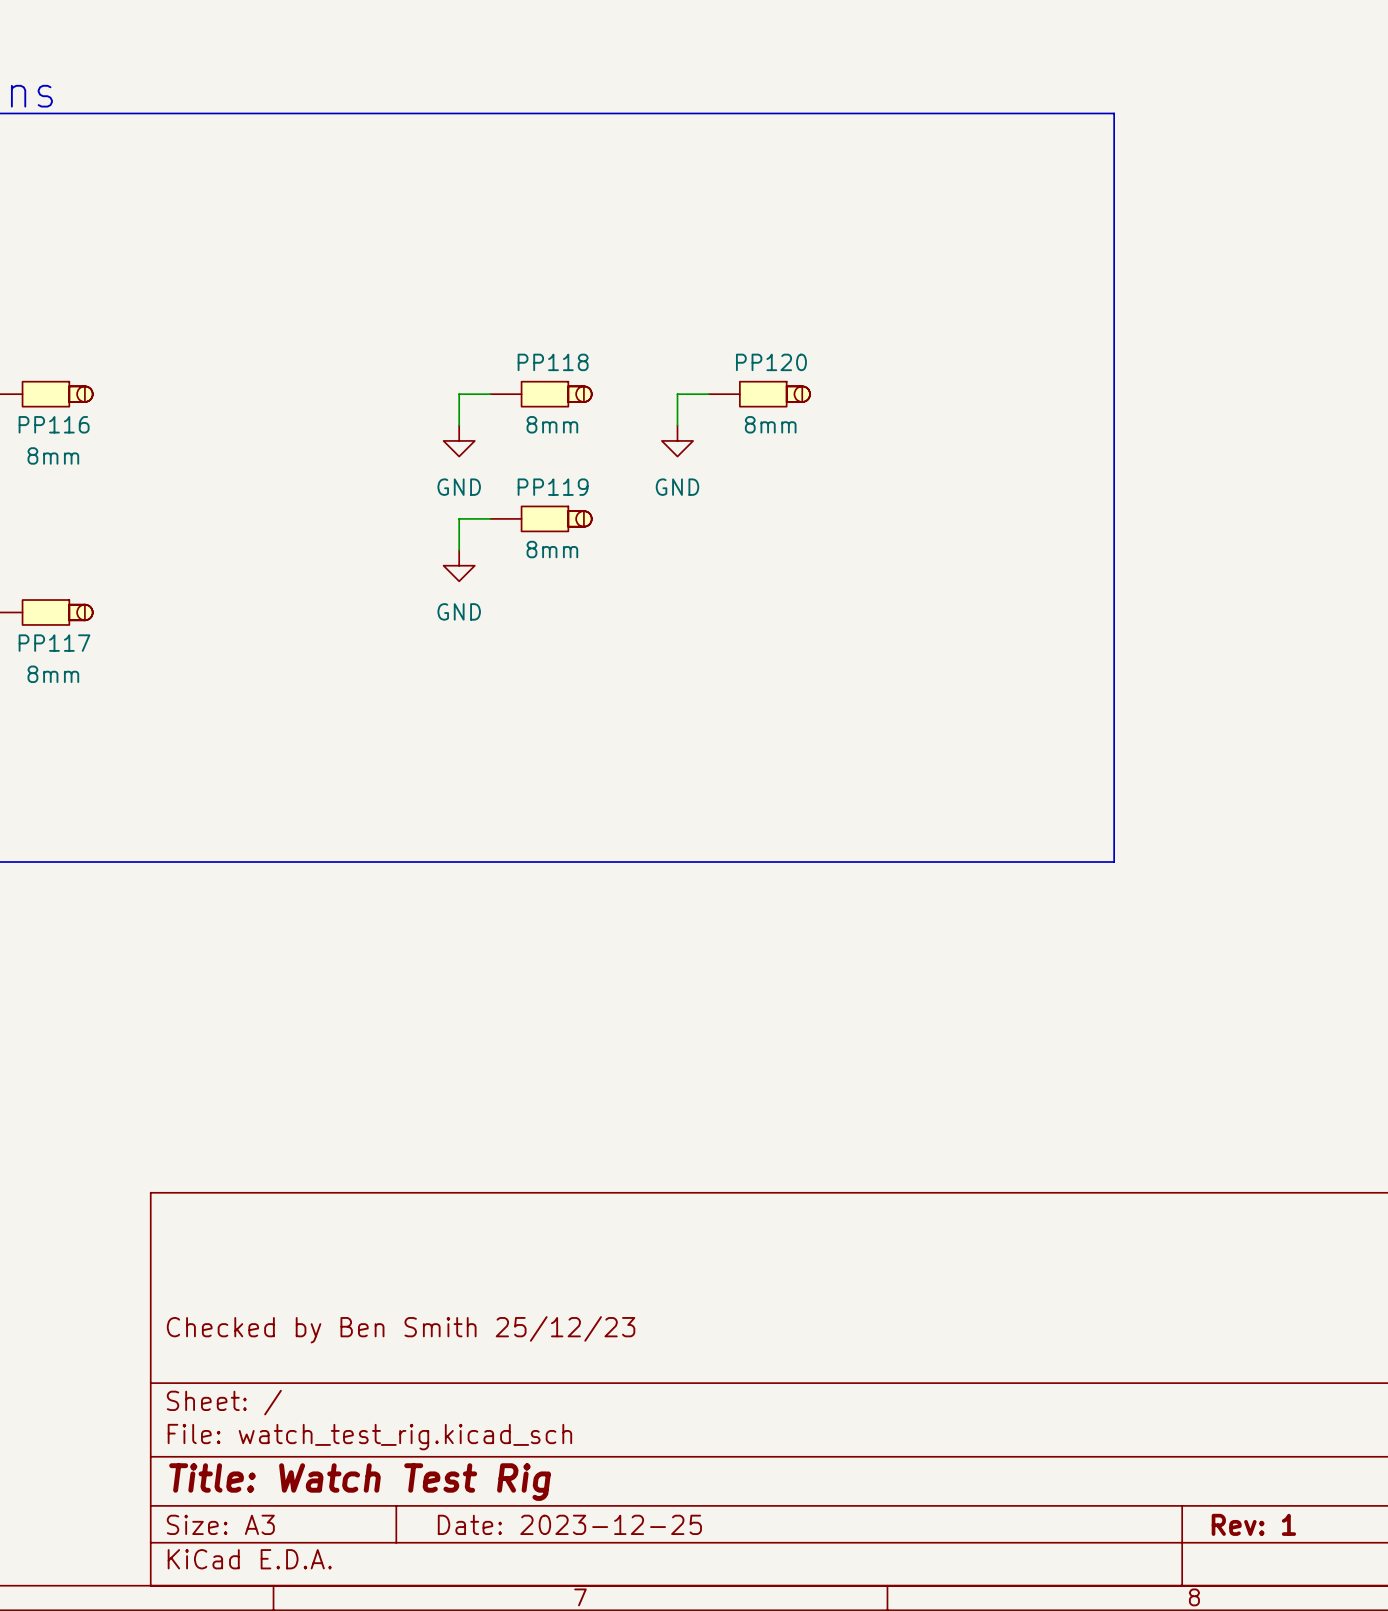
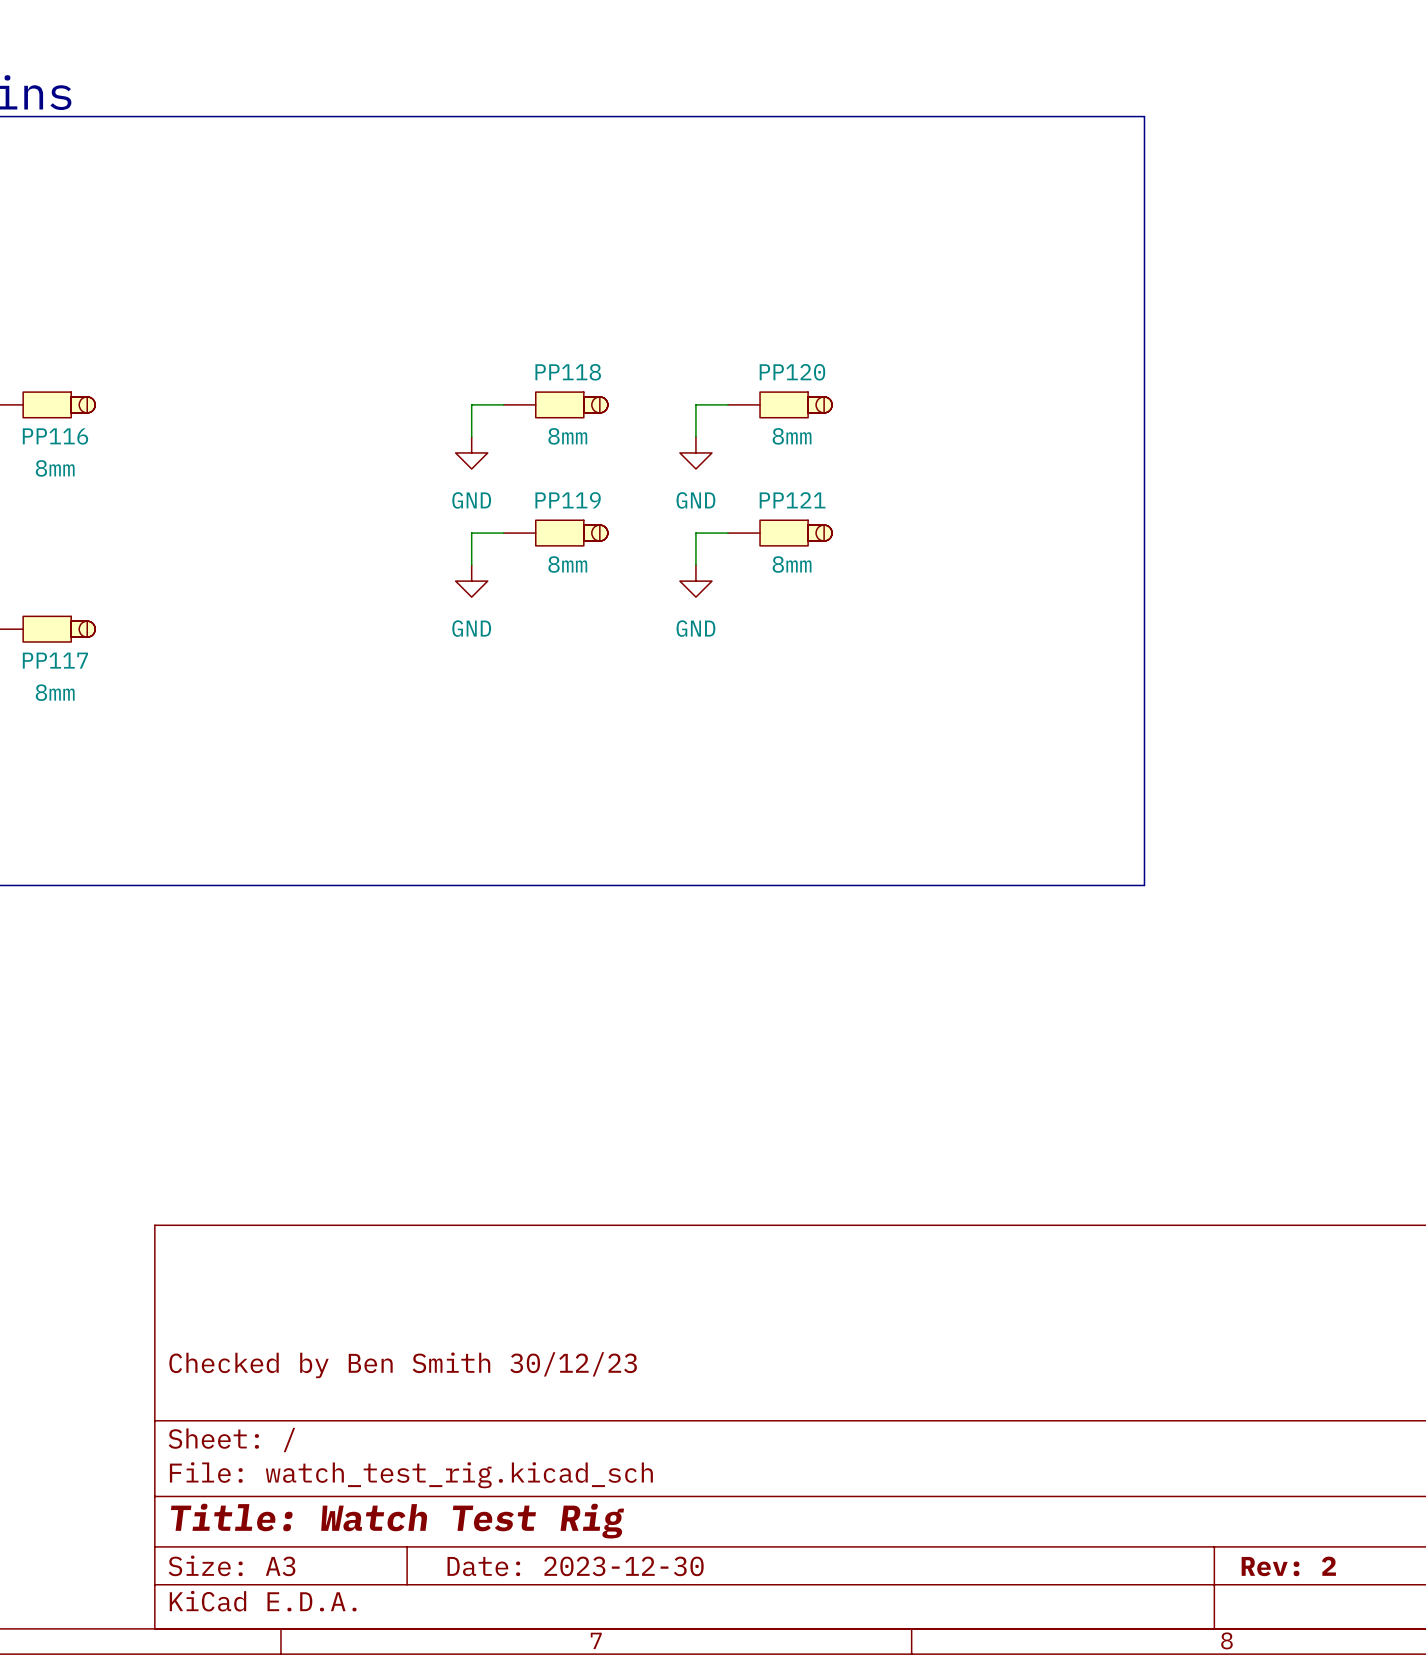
wire: none -> (727, 533) (695, 533) (695, 565)
PP121: none -> 8mm (780, 533)
power symbol: none -> GND (695, 581)
title block: Checked by Ben Smith 25/12/23 (401, 1329) -> Checked by Ben Smith 30/12/23 (403, 1365)
title block: Date: 2023-12-25 (569, 1524) -> Date: 2023-12-30 (575, 1566)
title block: Rev: 1 (1253, 1524) -> Rev: 2 (1288, 1566)

